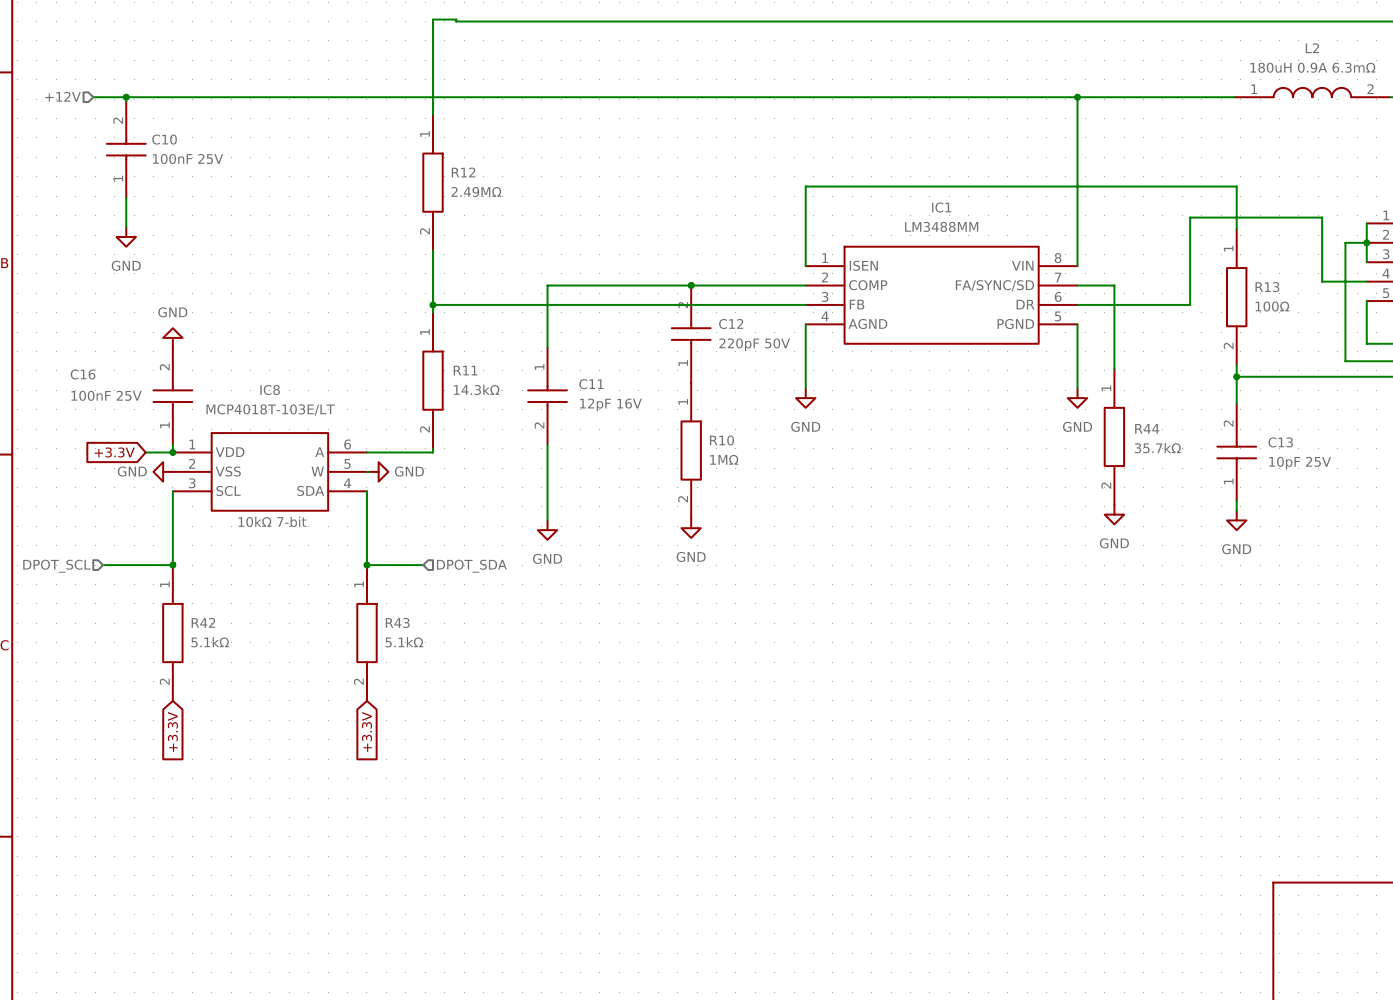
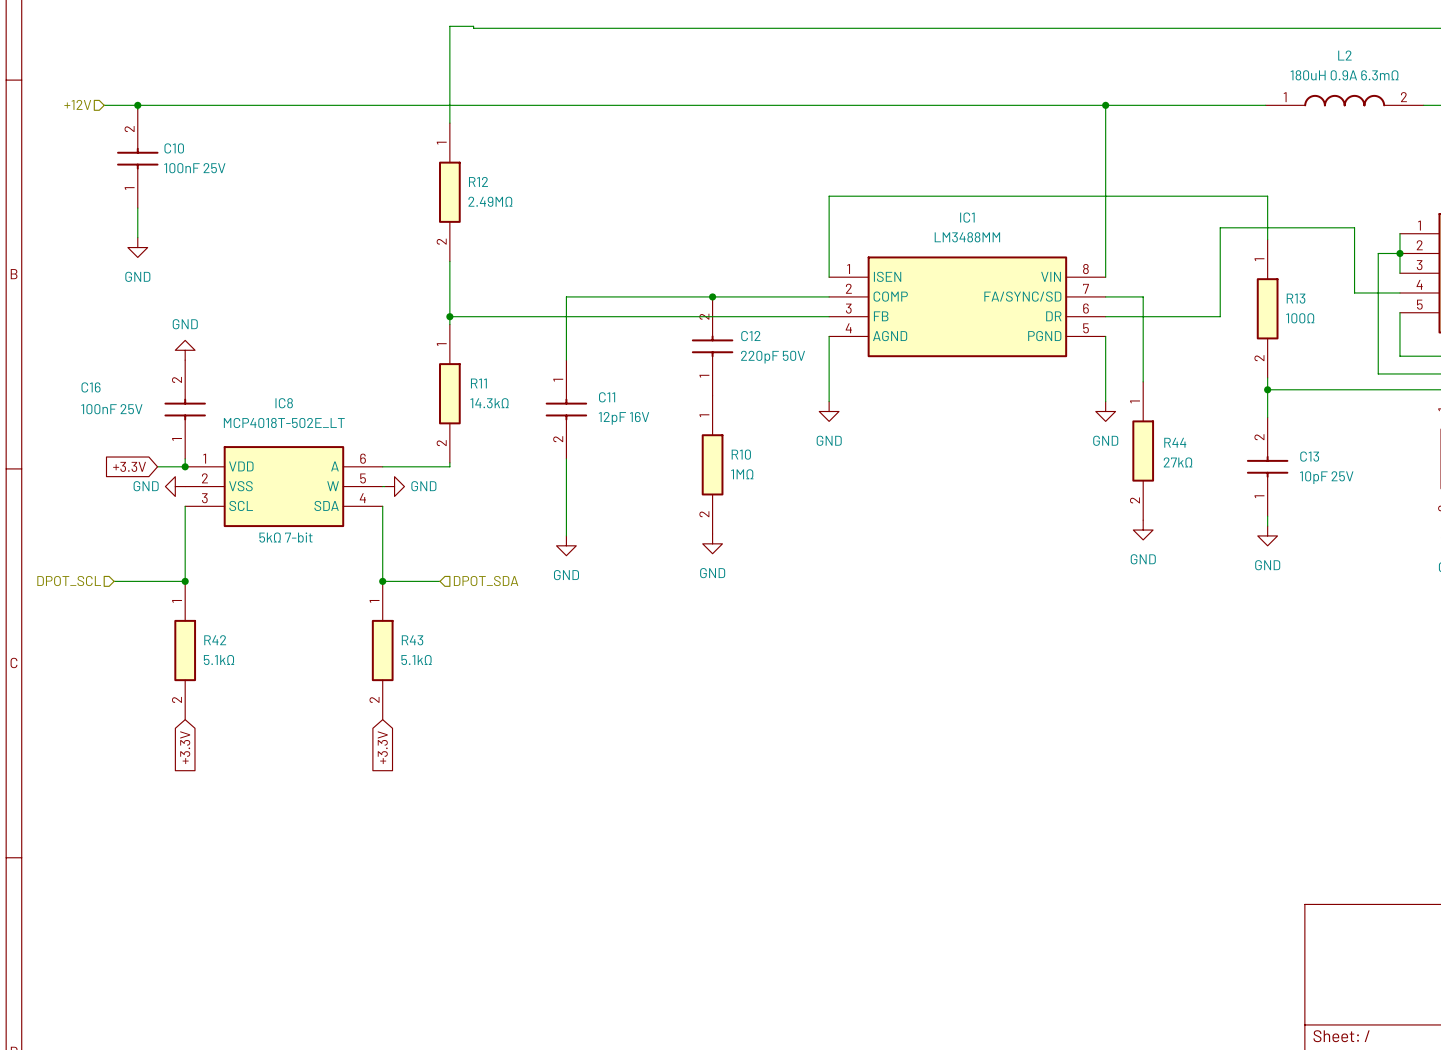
IC8 value: MCP4018T-103E/LT (270, 409) -> MCP4018T-502E_LT (284, 422)
R44 value: 35.7kΩ (1157, 448) -> 27kΩ (1178, 462)
IC8 text: 10kΩ 7-bit (272, 521) -> 5kΩ 7-bit (285, 537)

